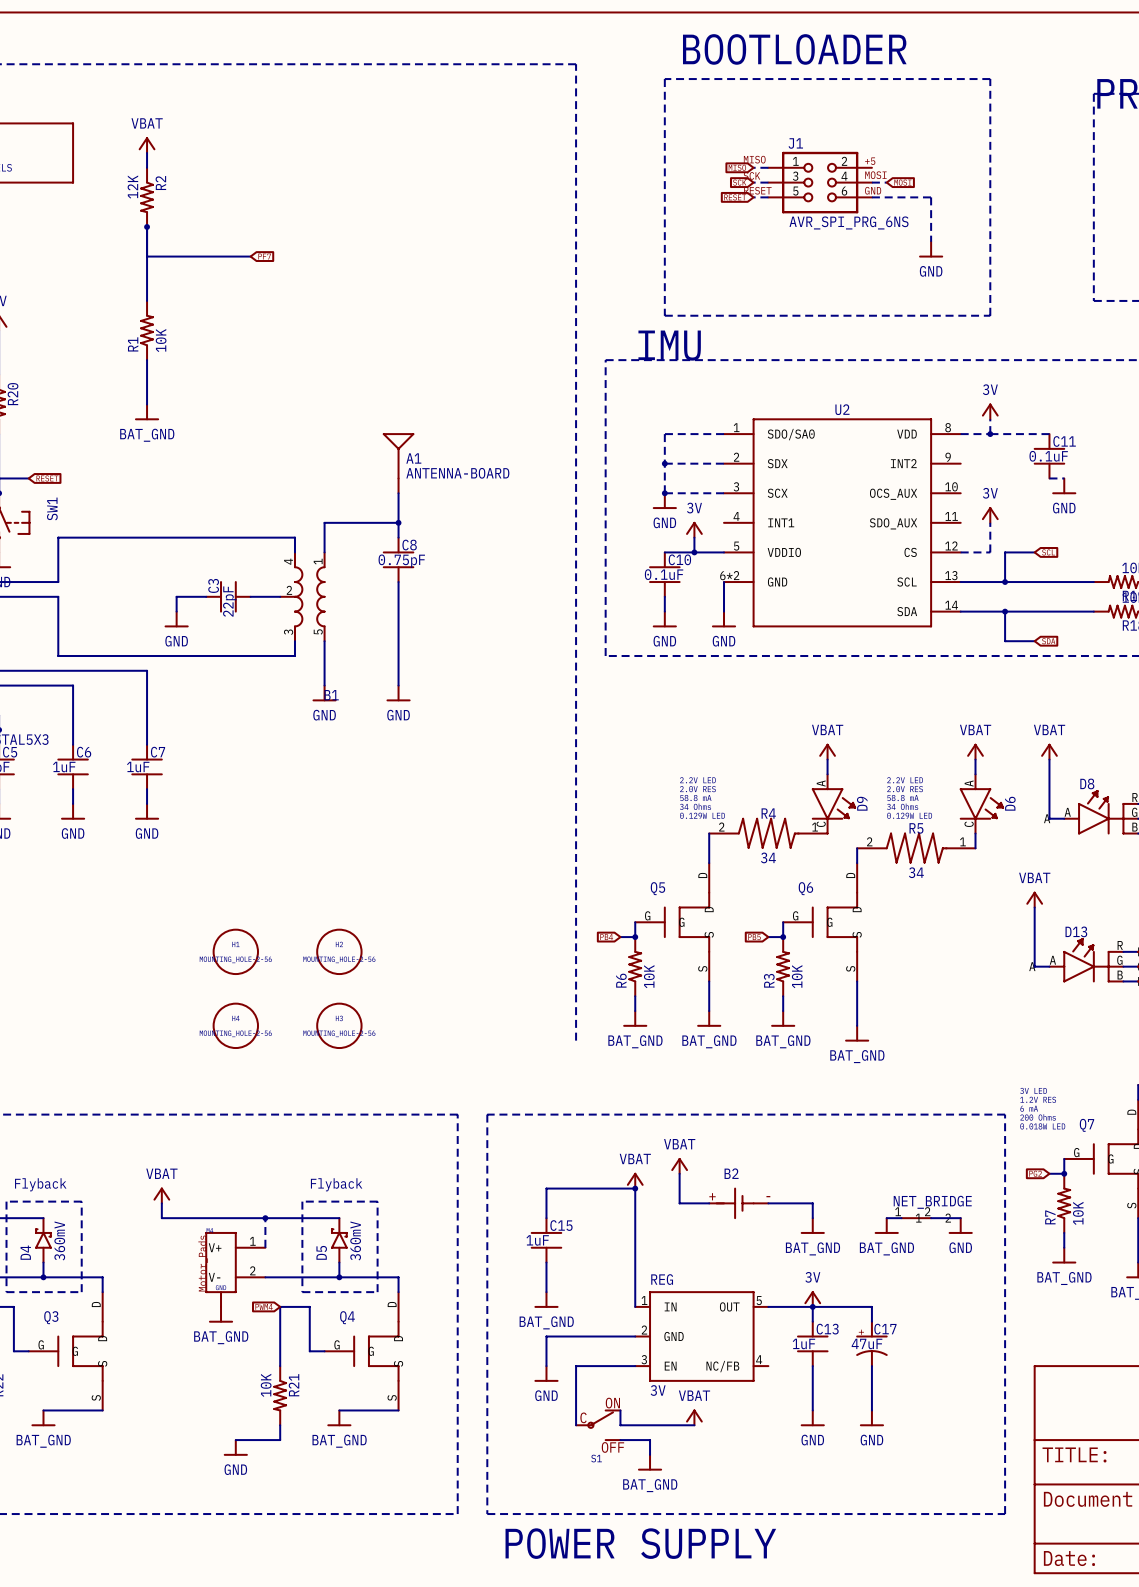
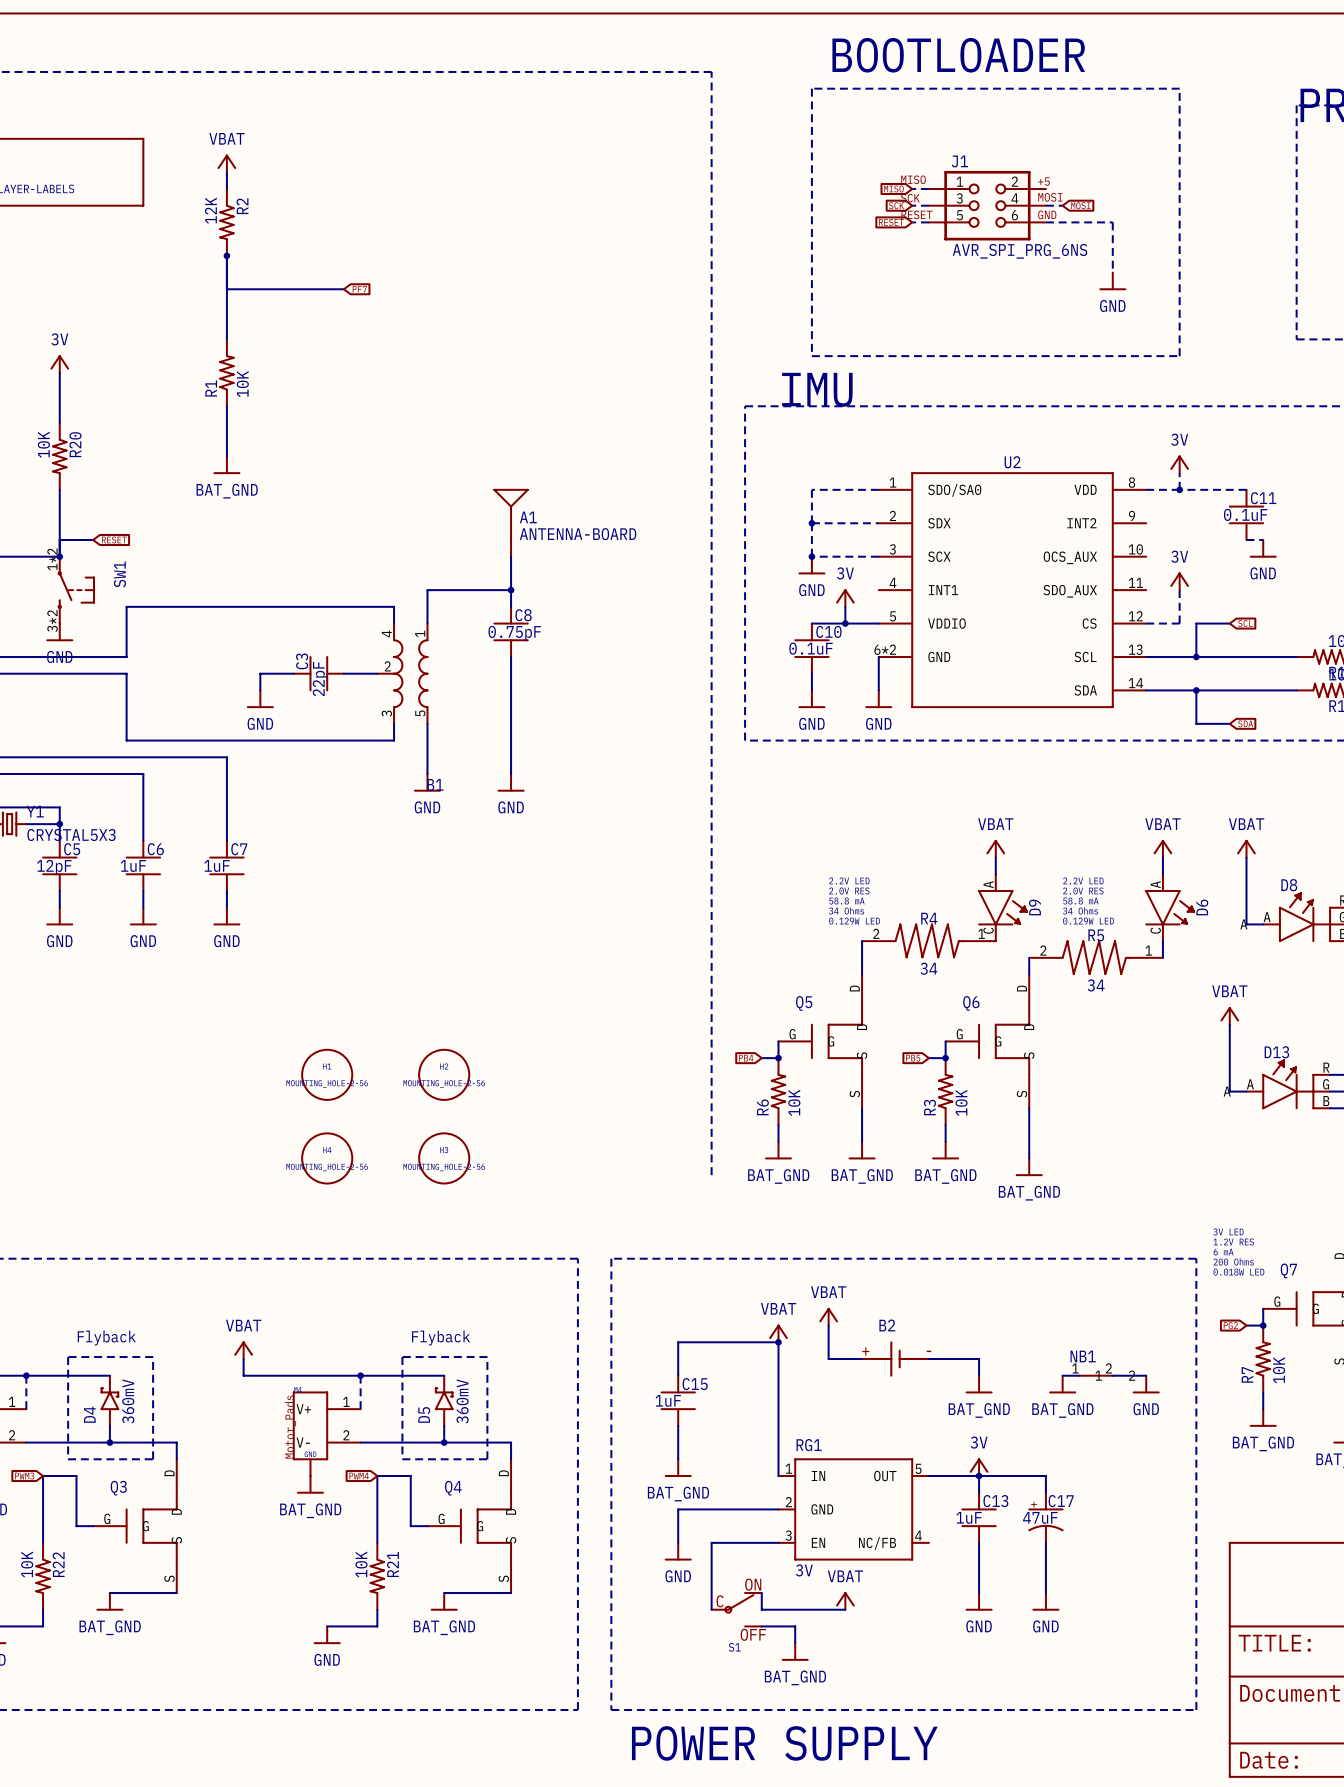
NET_BRIDGE name: NET_BRIDGE (932, 1202) -> NB1 (1083, 1356)
REG name: REG (662, 1279) -> RG1 (809, 1445)

